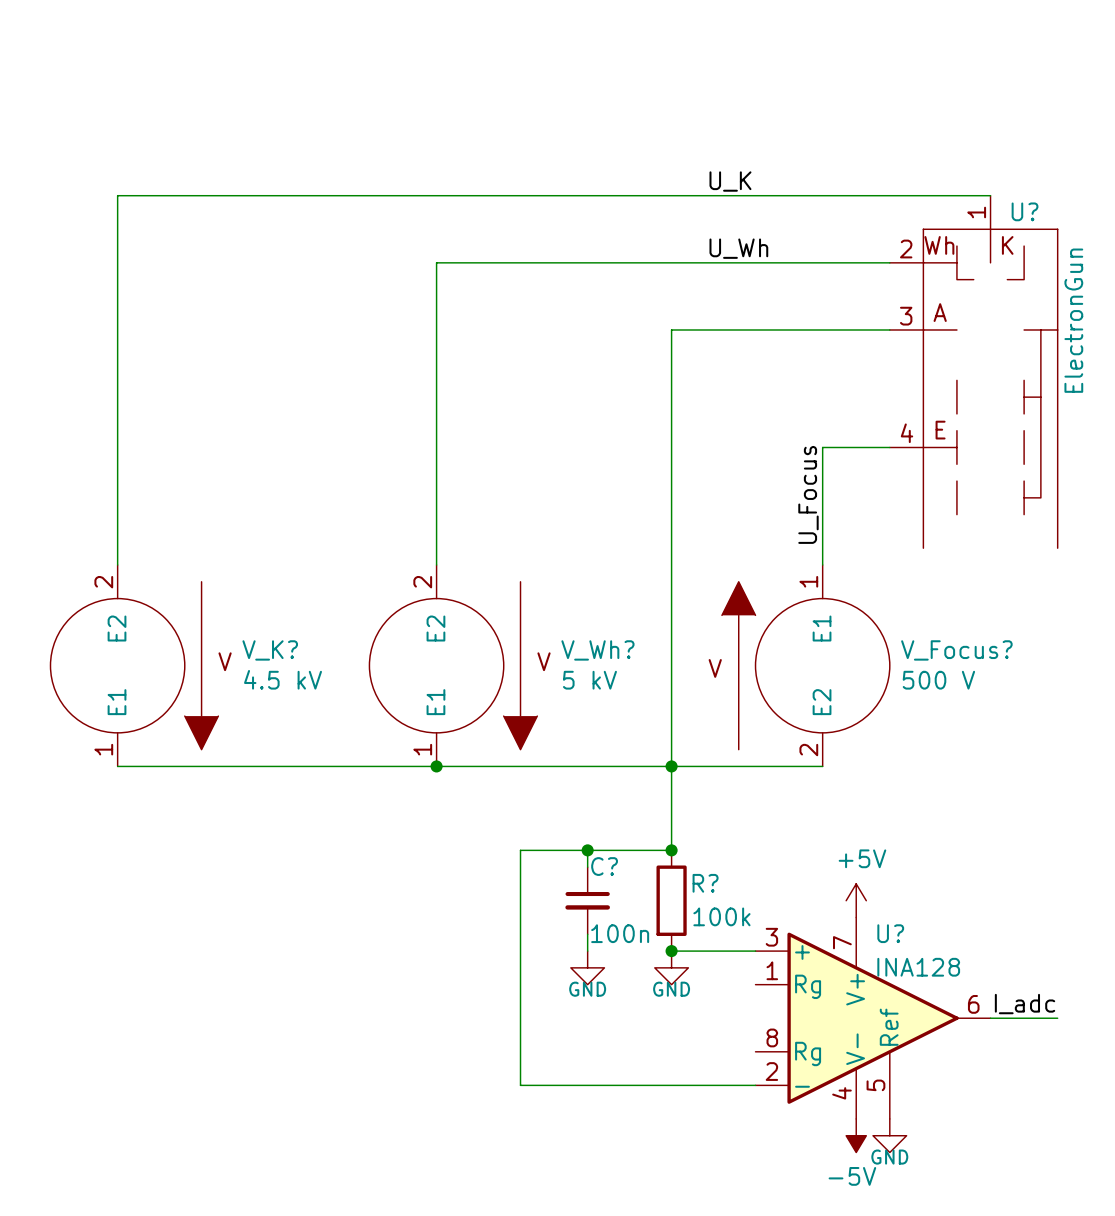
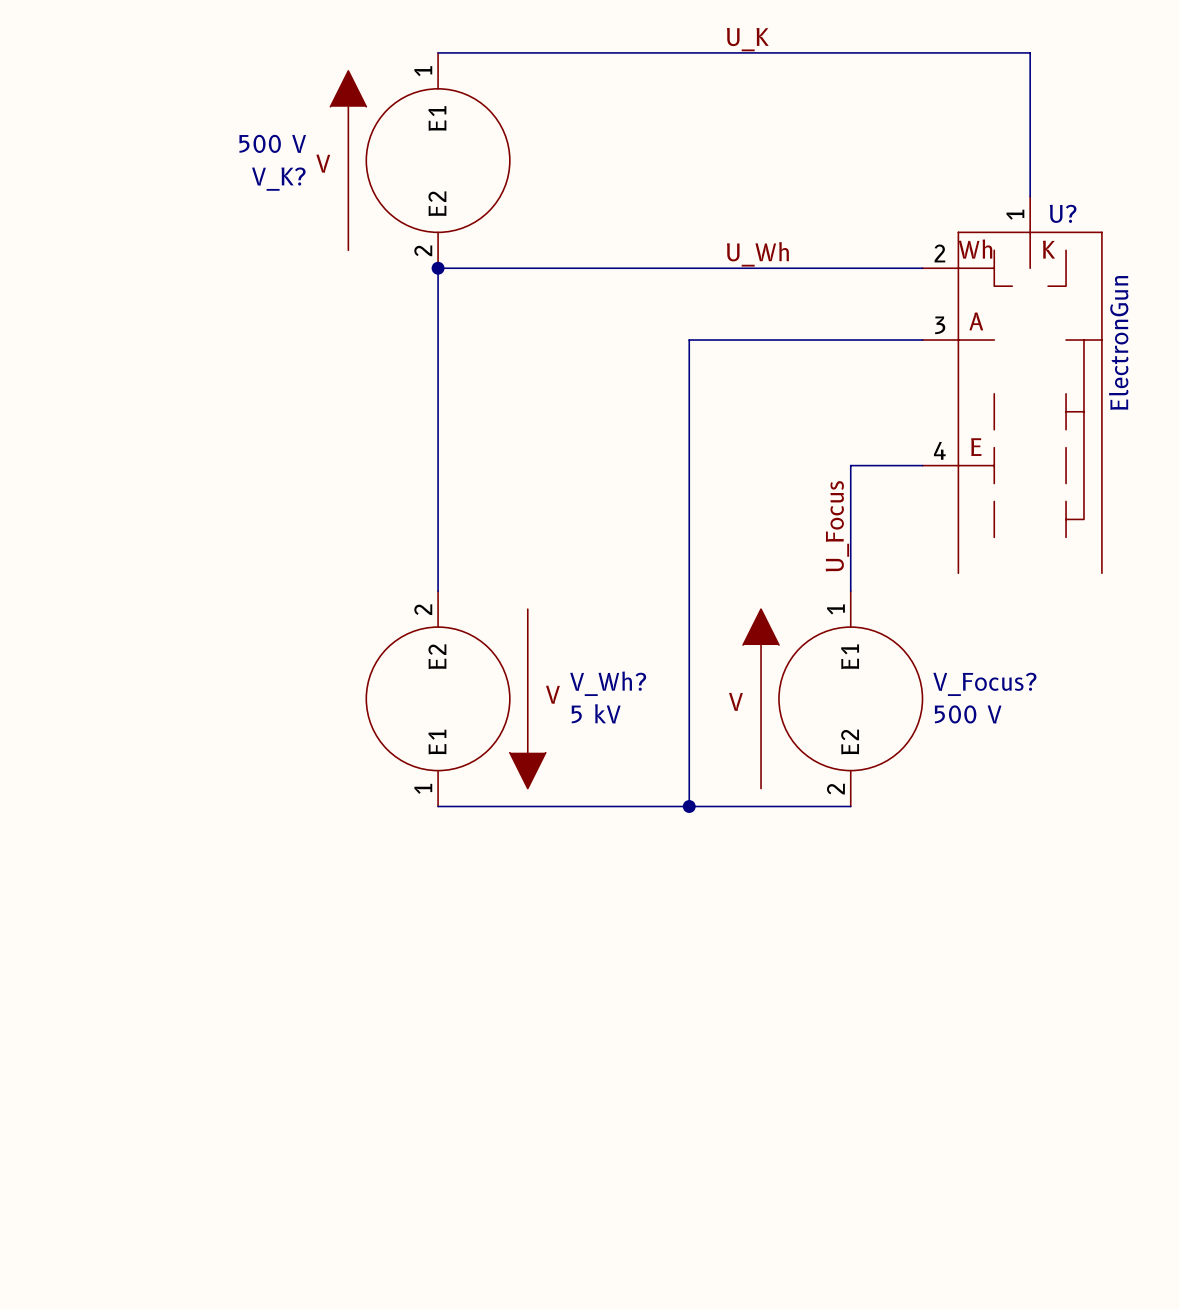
V_K?: none -> 500 V (420, 160)
label position: U_K (730, 181) -> U_K (747, 39)
wire: (990, 195) (117, 195) (117, 565) -> (1030, 196) (1030, 52) (438, 52)
junction: none -> (438, 268)
V_K?: 4.5 kV (134, 665) -> none
wire: (117, 766) (436, 766) -> none
junction: (436, 766) -> none
wire: (671, 766) (671, 850) (520, 850) (520, 1085) (755, 1085) -> none
wire: (587, 850) (587, 867) -> none
junction: (587, 850) -> none
junction: (671, 850) -> none
C?: 100n (587, 900) -> none
R?: 100k (671, 900) -> none
power symbol: +5V (856, 900) -> none
wire: (587, 934) (587, 951) -> none
wire: (671, 951) (755, 951) -> none
junction: (671, 951) -> none
power symbol: GND (587, 967) -> none
power symbol: GND (671, 967) -> none
label: I_adc (1025, 1004) -> none
U?: INA128 (873, 1018) -> none
wire: (990, 1018) (1057, 1018) -> none
power symbol: -5V (856, 1135) -> none
power symbol: GND (889, 1135) -> none

